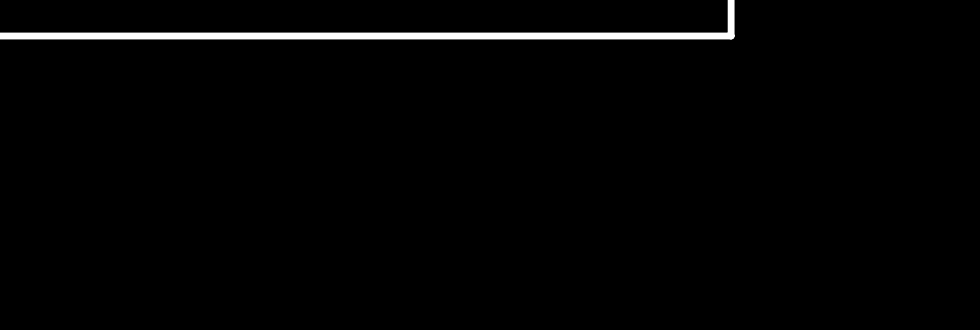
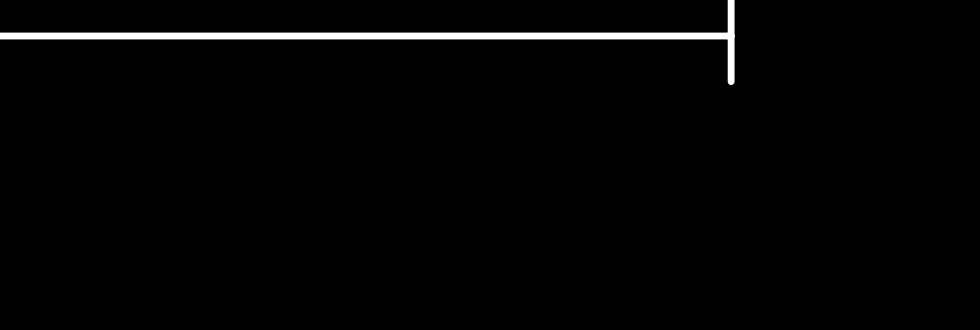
board edge: none -> (731, 36) (731, 81)

